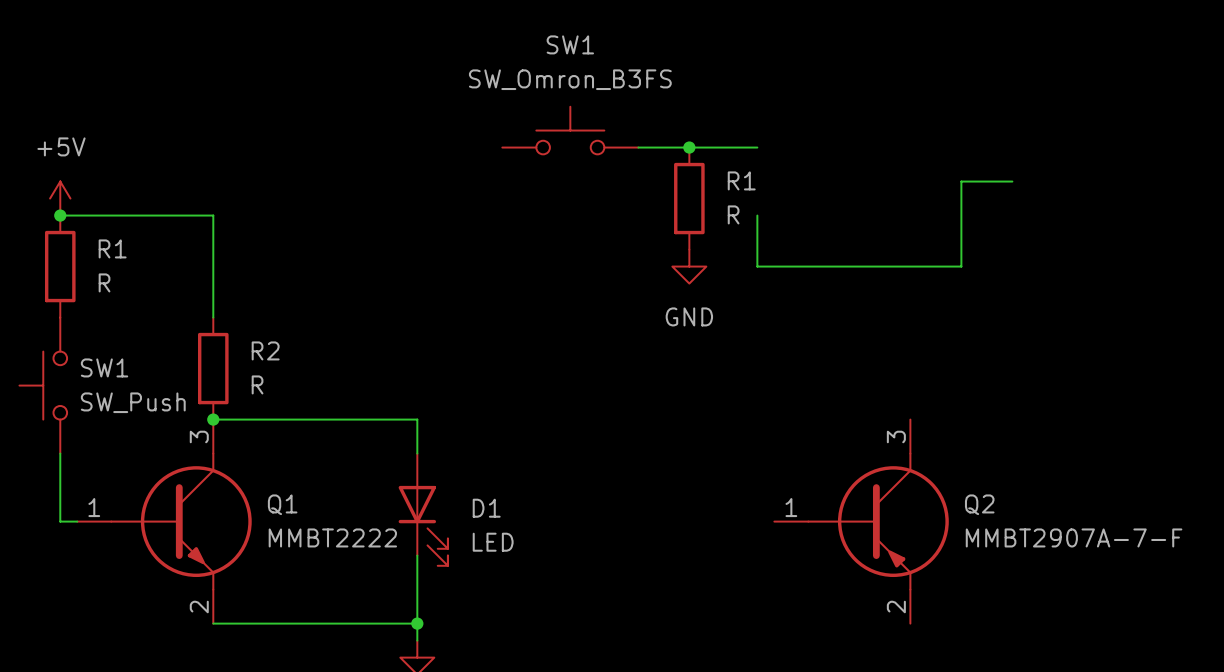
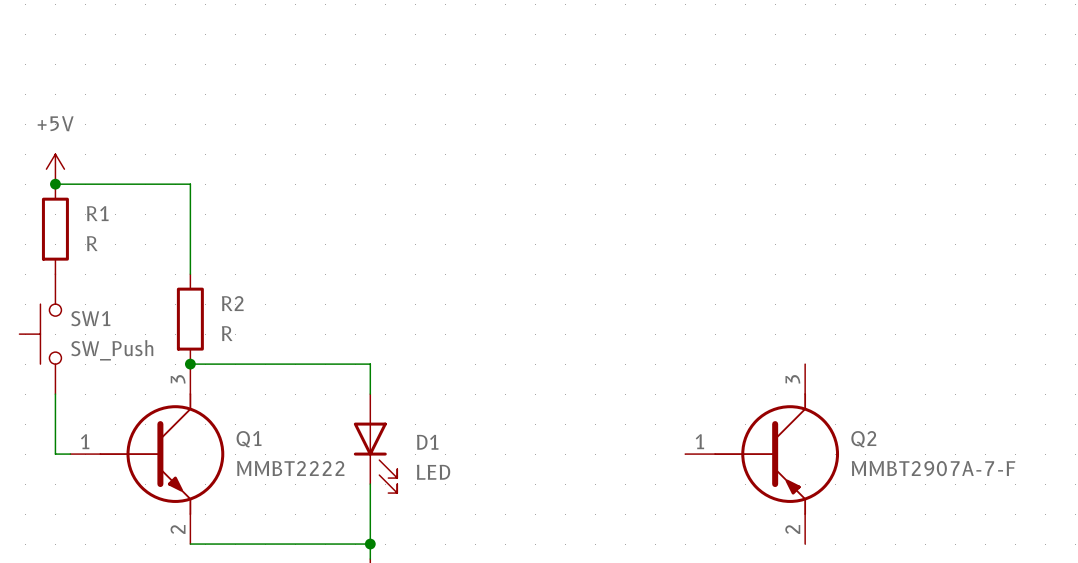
SW1: SW_Omron_B3FS (570, 130) -> none
wire: (638, 147) (757, 147) -> none
junction: (689, 147) -> none
wire: (1012, 181) (961, 181) (961, 266) (757, 266) (757, 215) -> none
R1: R (689, 198) -> none
power symbol: GND (689, 266) -> none

